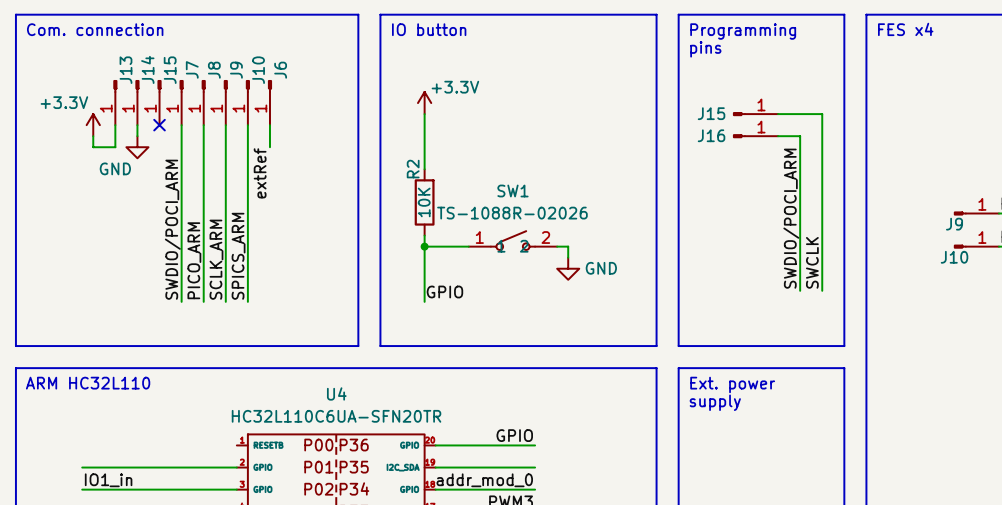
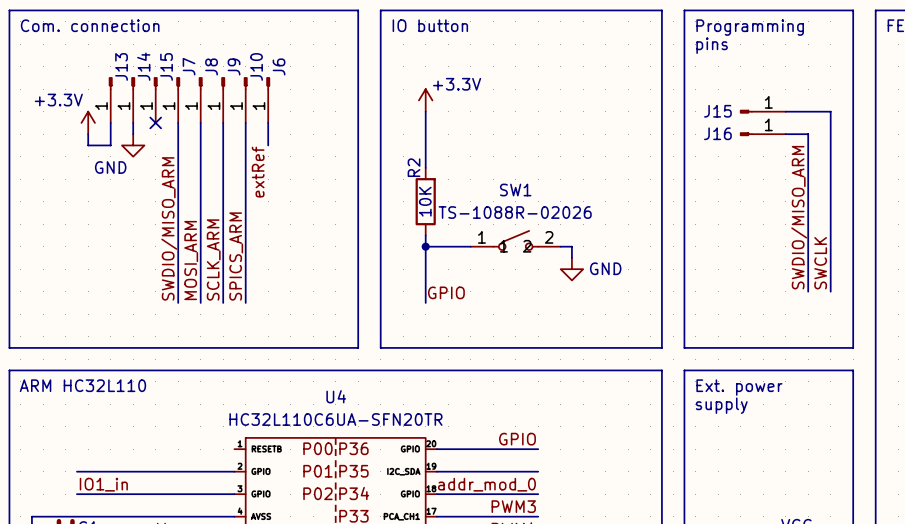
label: SWDIO/POCI_ARM (791, 218) -> SWDIO/MISO_ARM (799, 217)
label: SWDIO/POCI_ARM (172, 229) -> SWDIO/MISO_ARM (169, 228)
label: PICO_ARM (194, 260) -> MOSI_ARM (191, 260)

